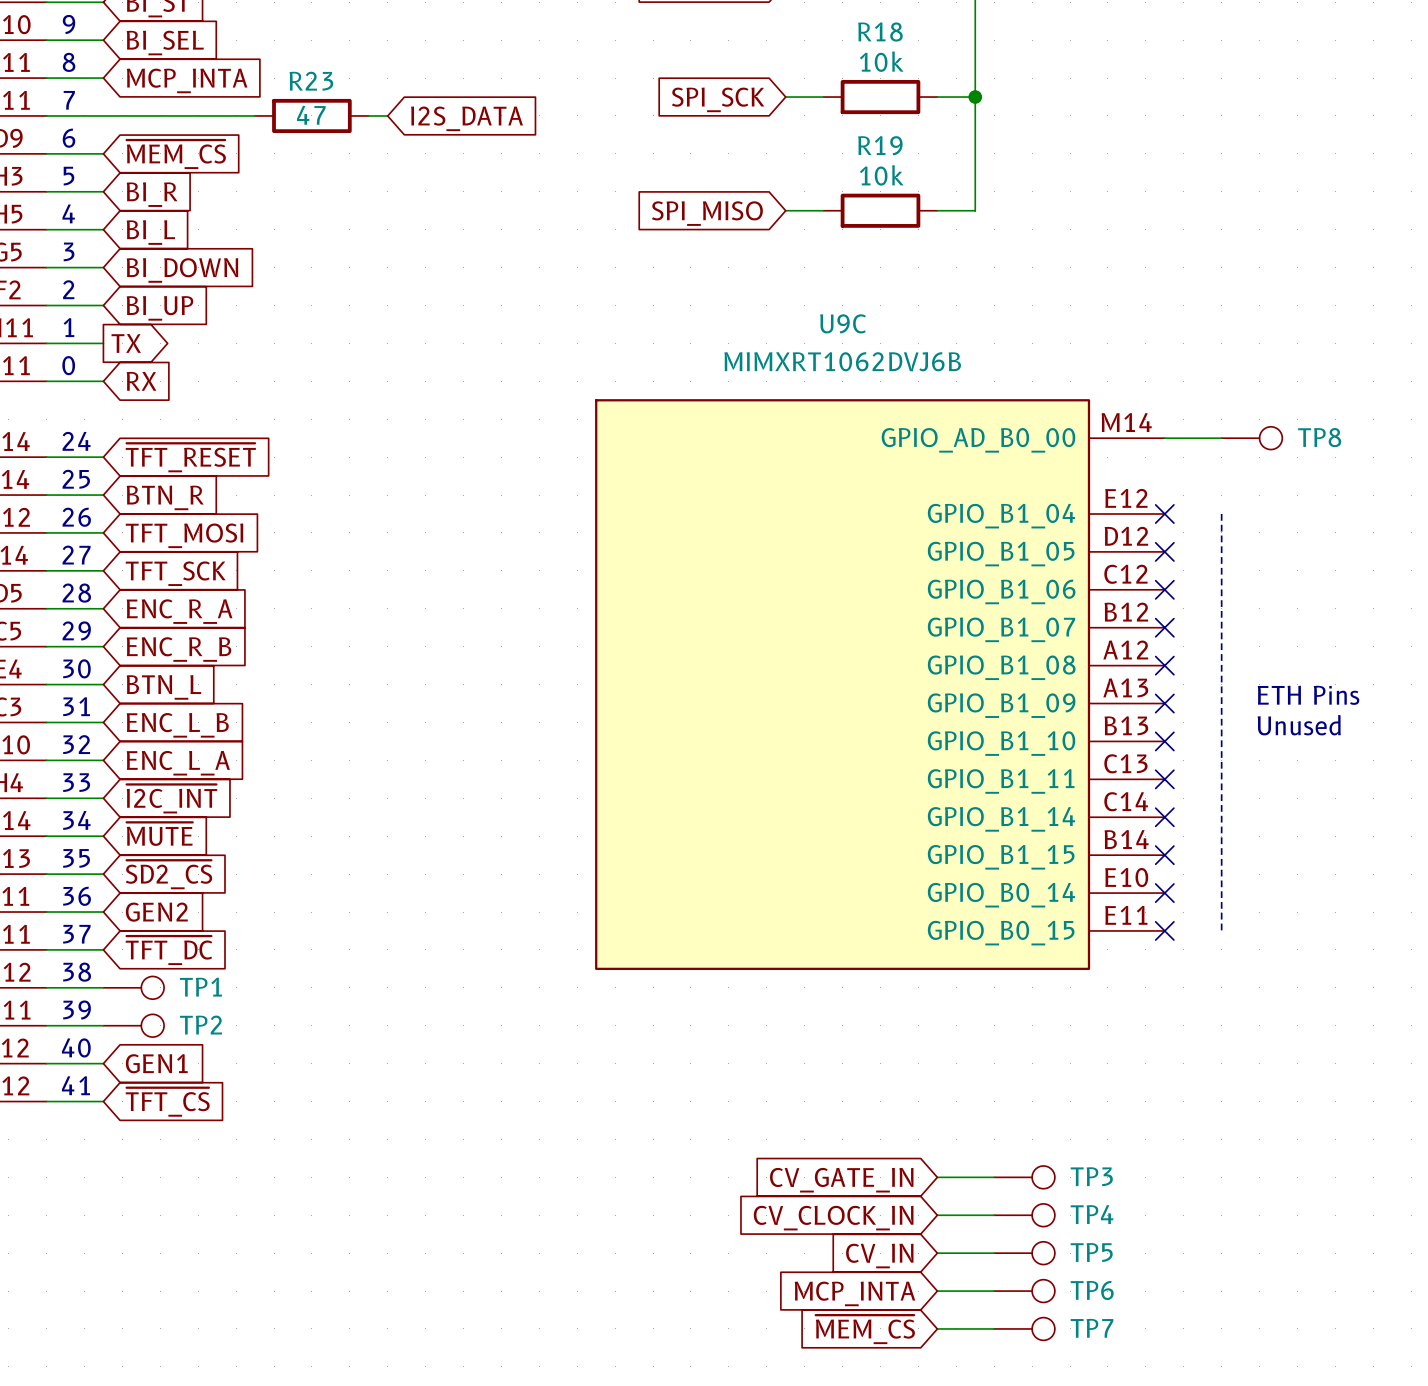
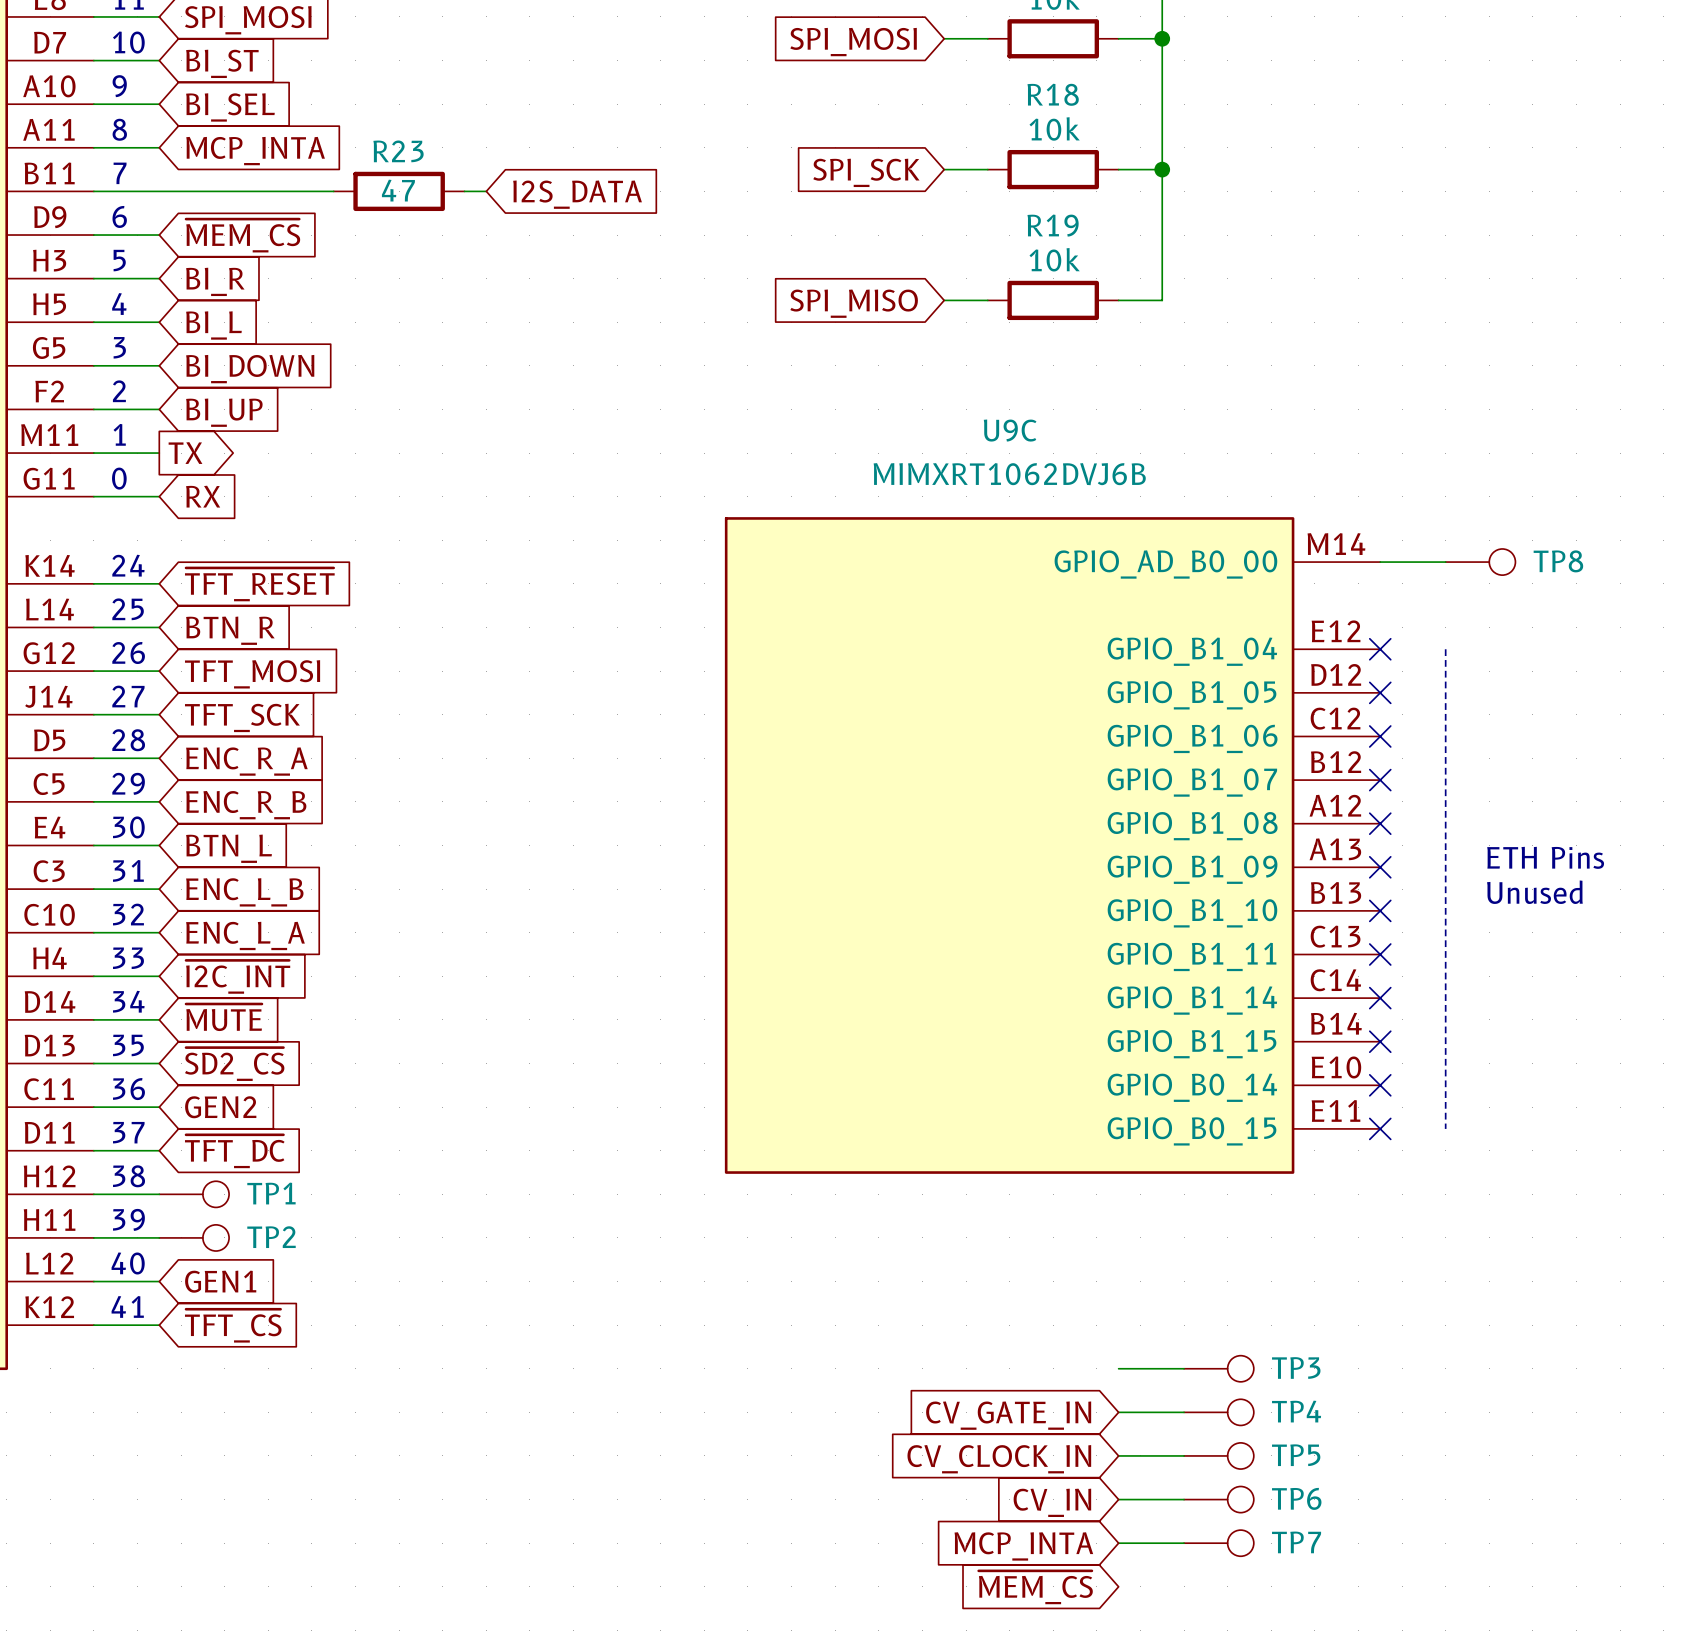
TP3: none -> (1218, 1368)
TP3 name: TP3 (1091, 1176) -> TP4 (1296, 1411)
TP4 name: TP4 (1092, 1214) -> TP5 (1296, 1455)
TP5 name: TP5 (1091, 1252) -> TP6 (1296, 1498)
TP6 name: TP6 (1092, 1290) -> TP7 (1296, 1542)
wire: (937, 1328) (994, 1328) -> (1118, 1368) (1184, 1368)
TP7: (1024, 1328) -> none

